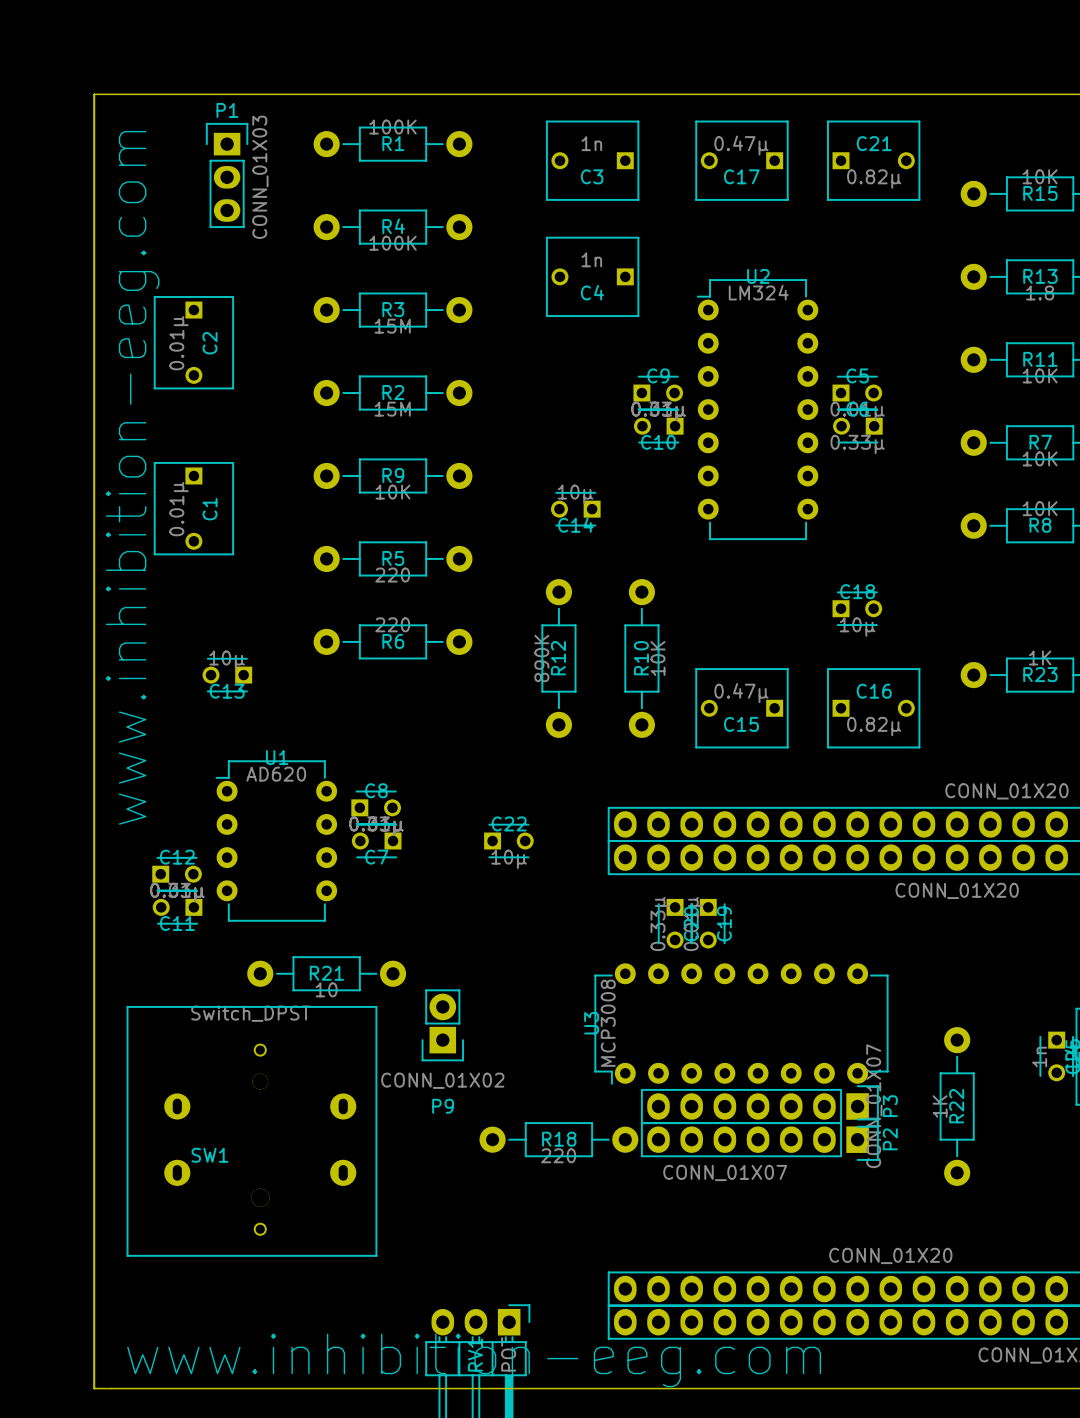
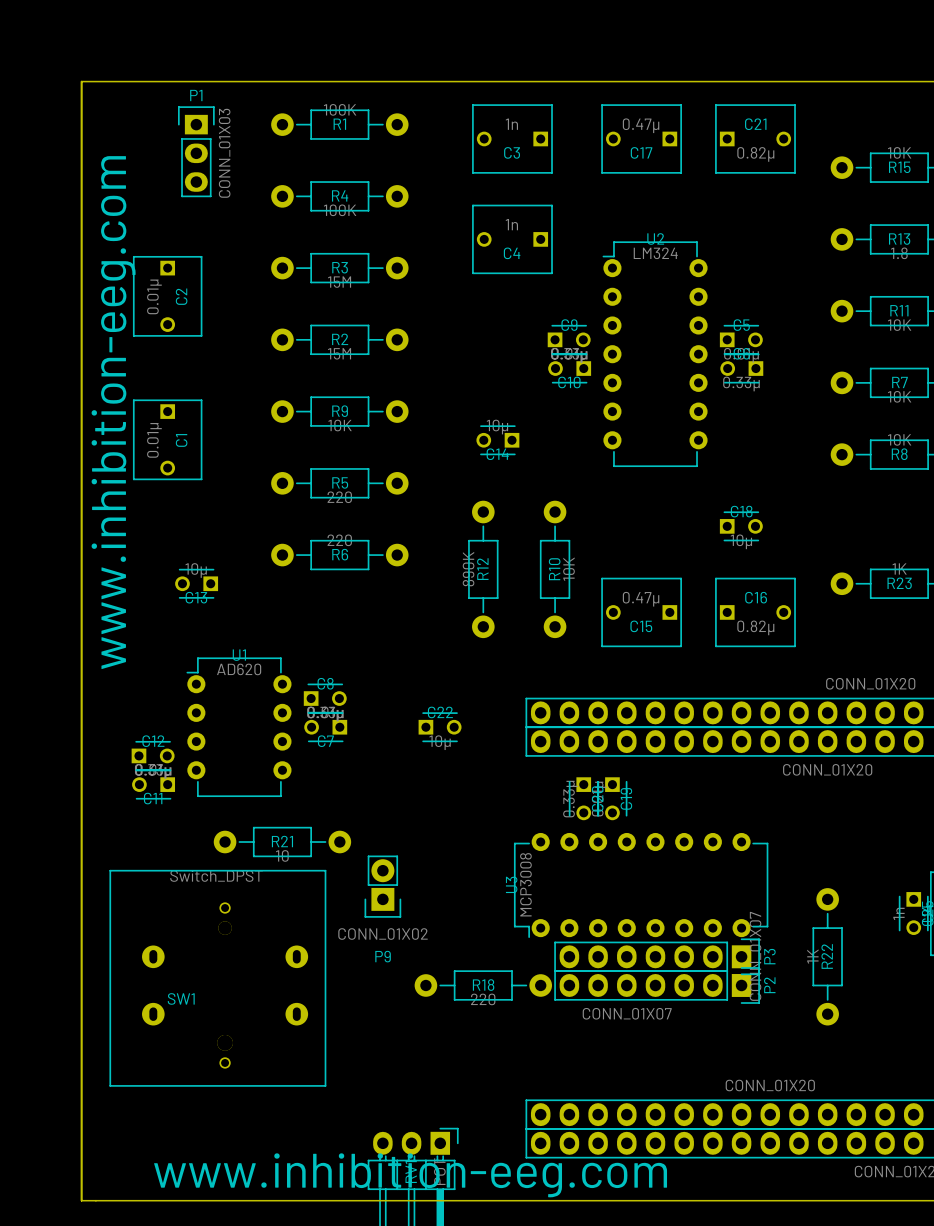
SW1 footprint: [126, 1005, 378, 1257] -> [109, 869, 327, 1087]

